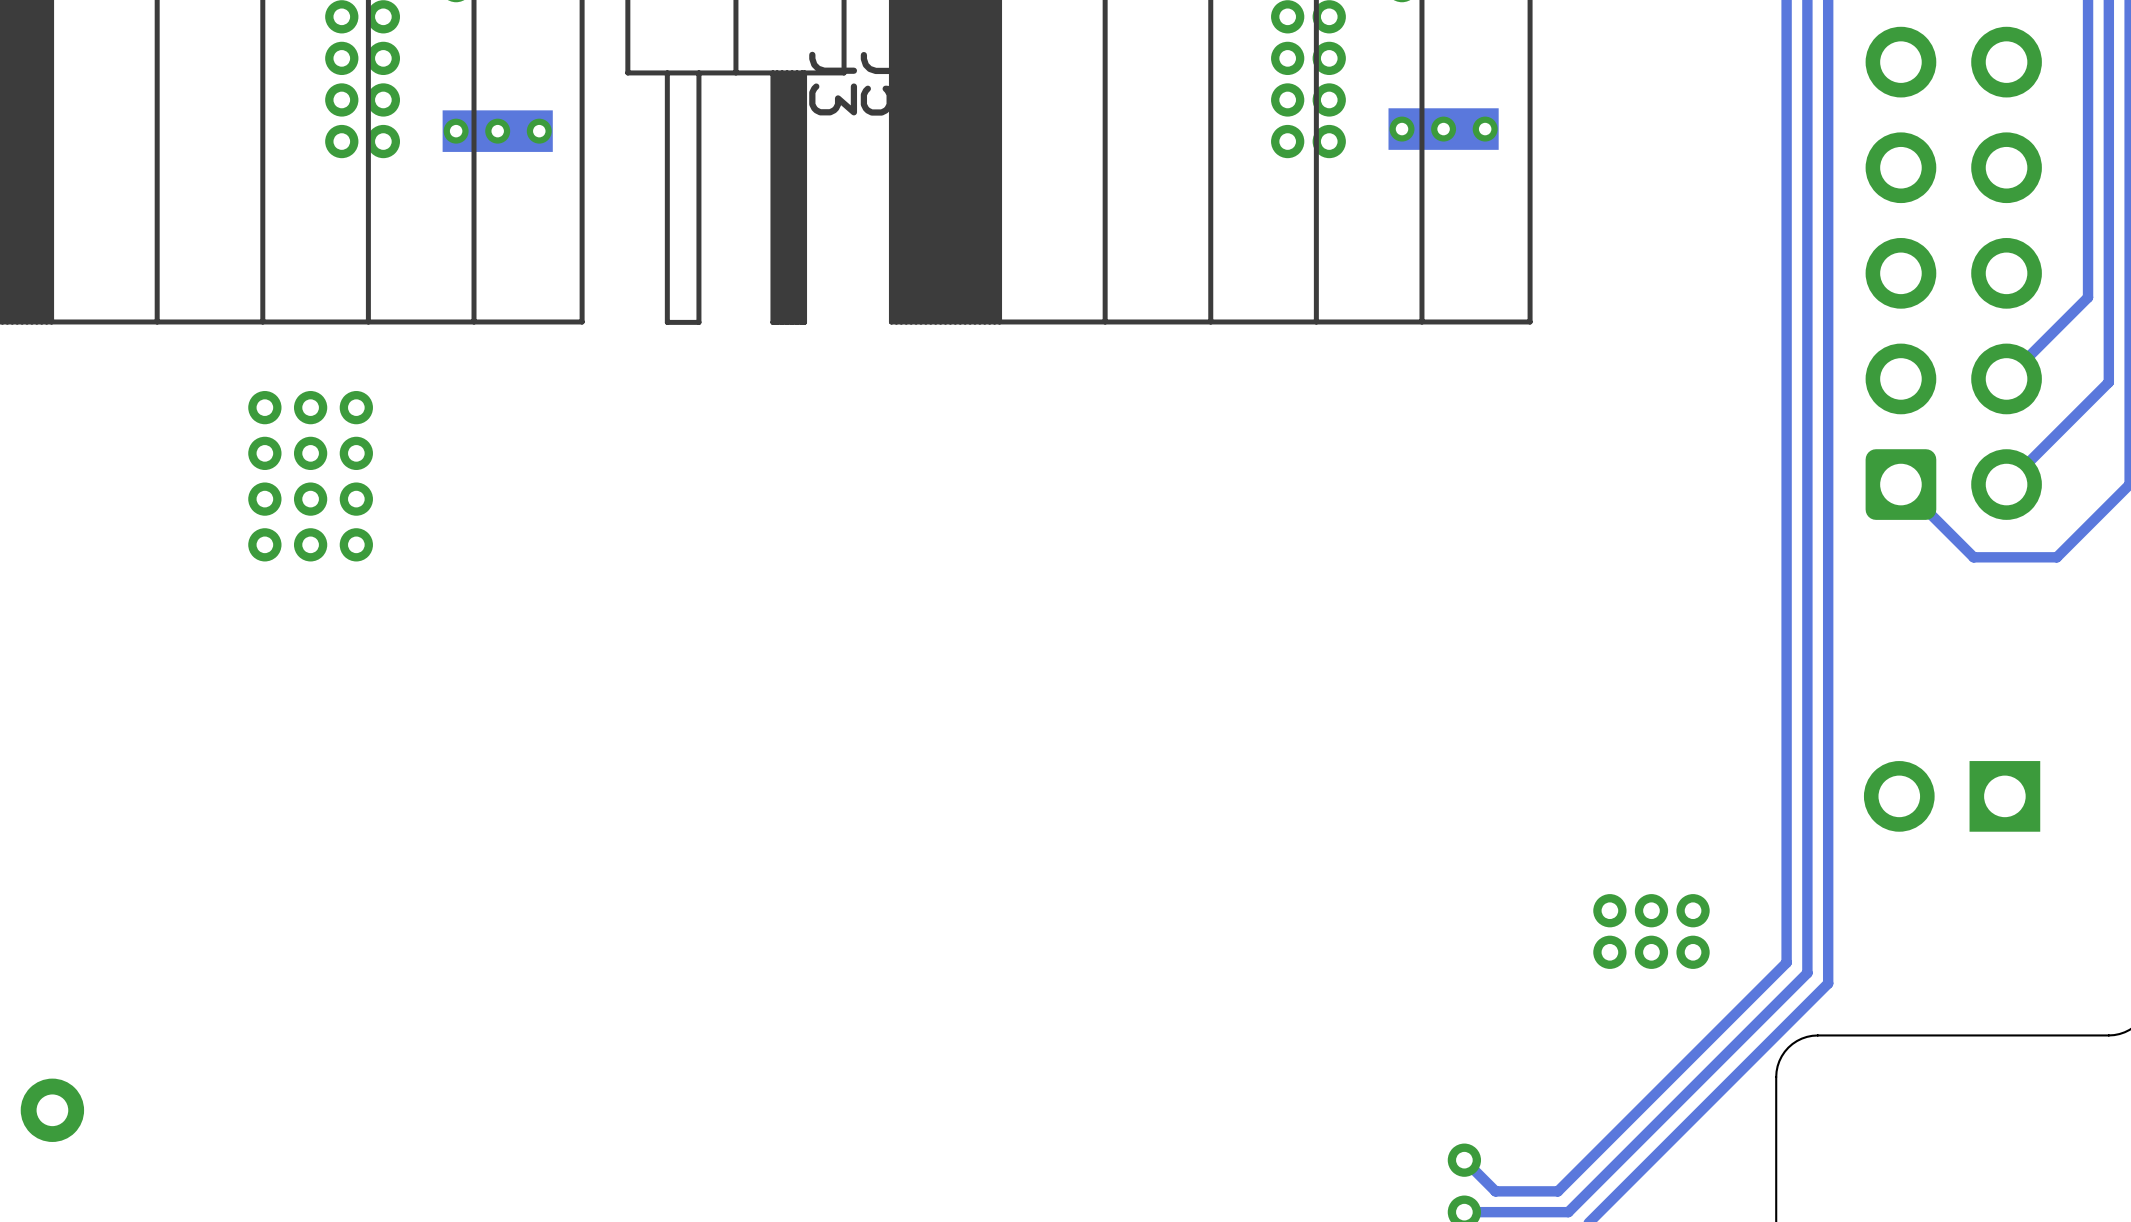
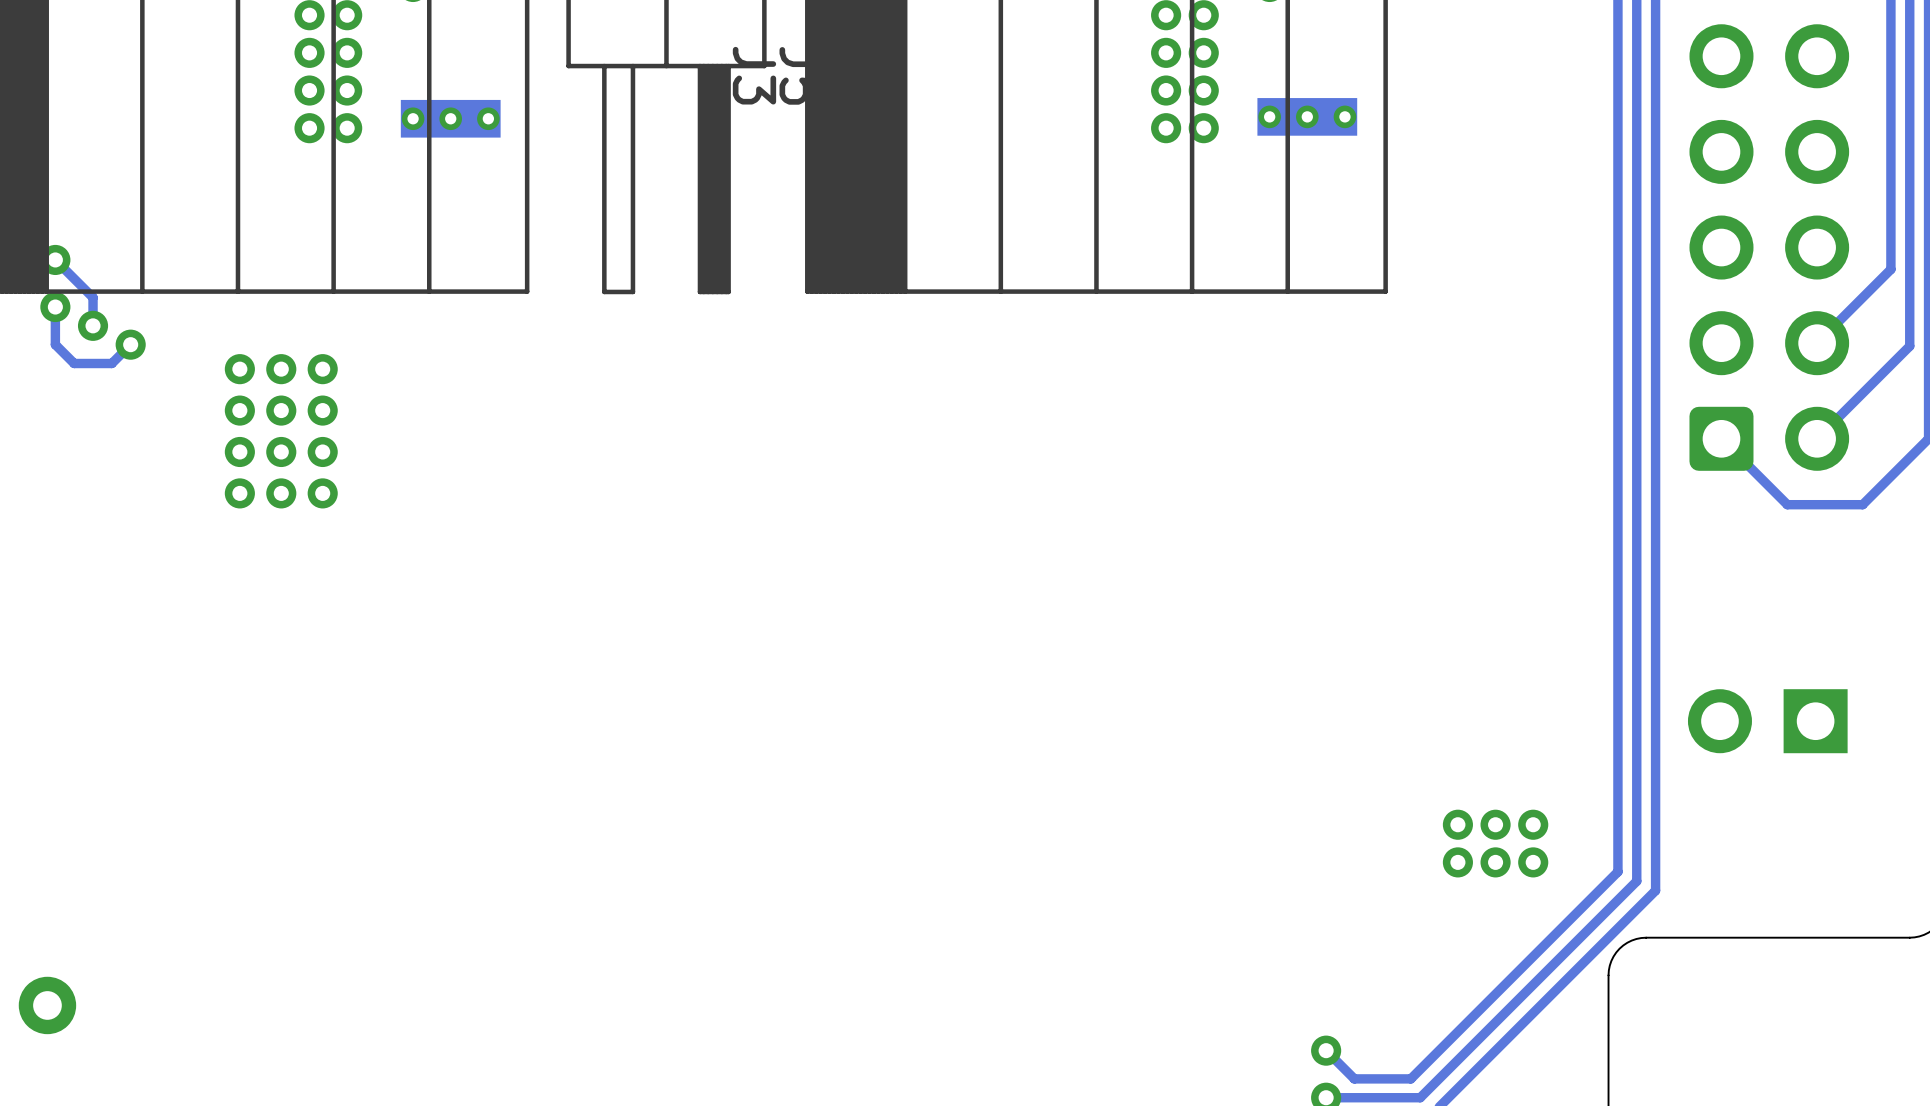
track: none -> (55, 259) (93, 297) (93, 325)
via: none -> (55, 259)
track: none -> (55, 307) (55, 344) (74, 363) (111, 363) (130, 344)
via: none -> (55, 307)
via: none -> (93, 325)
via: none -> (130, 344)

